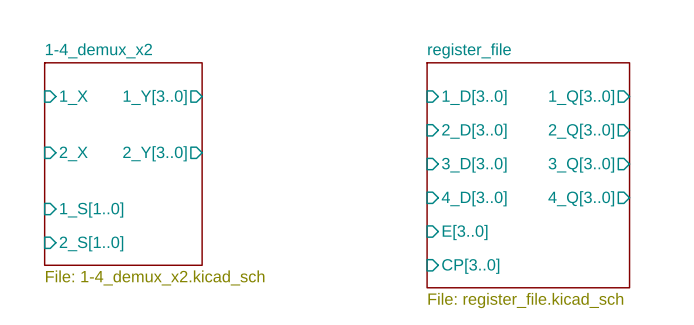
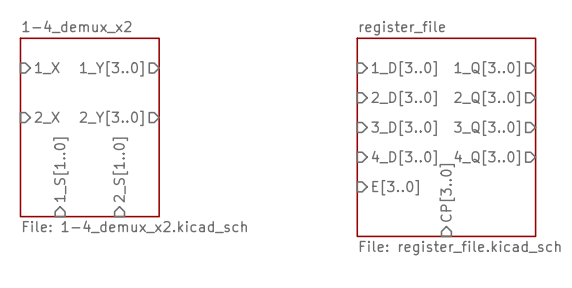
sheet pin rotation: 0° (91, 210) -> 90° counterclockwise (60, 169)
sheet pin rotation: 0° (91, 243) -> 90° counterclockwise (120, 170)
sheet pin rotation: 0° (470, 266) -> 90° counterclockwise (447, 192)

